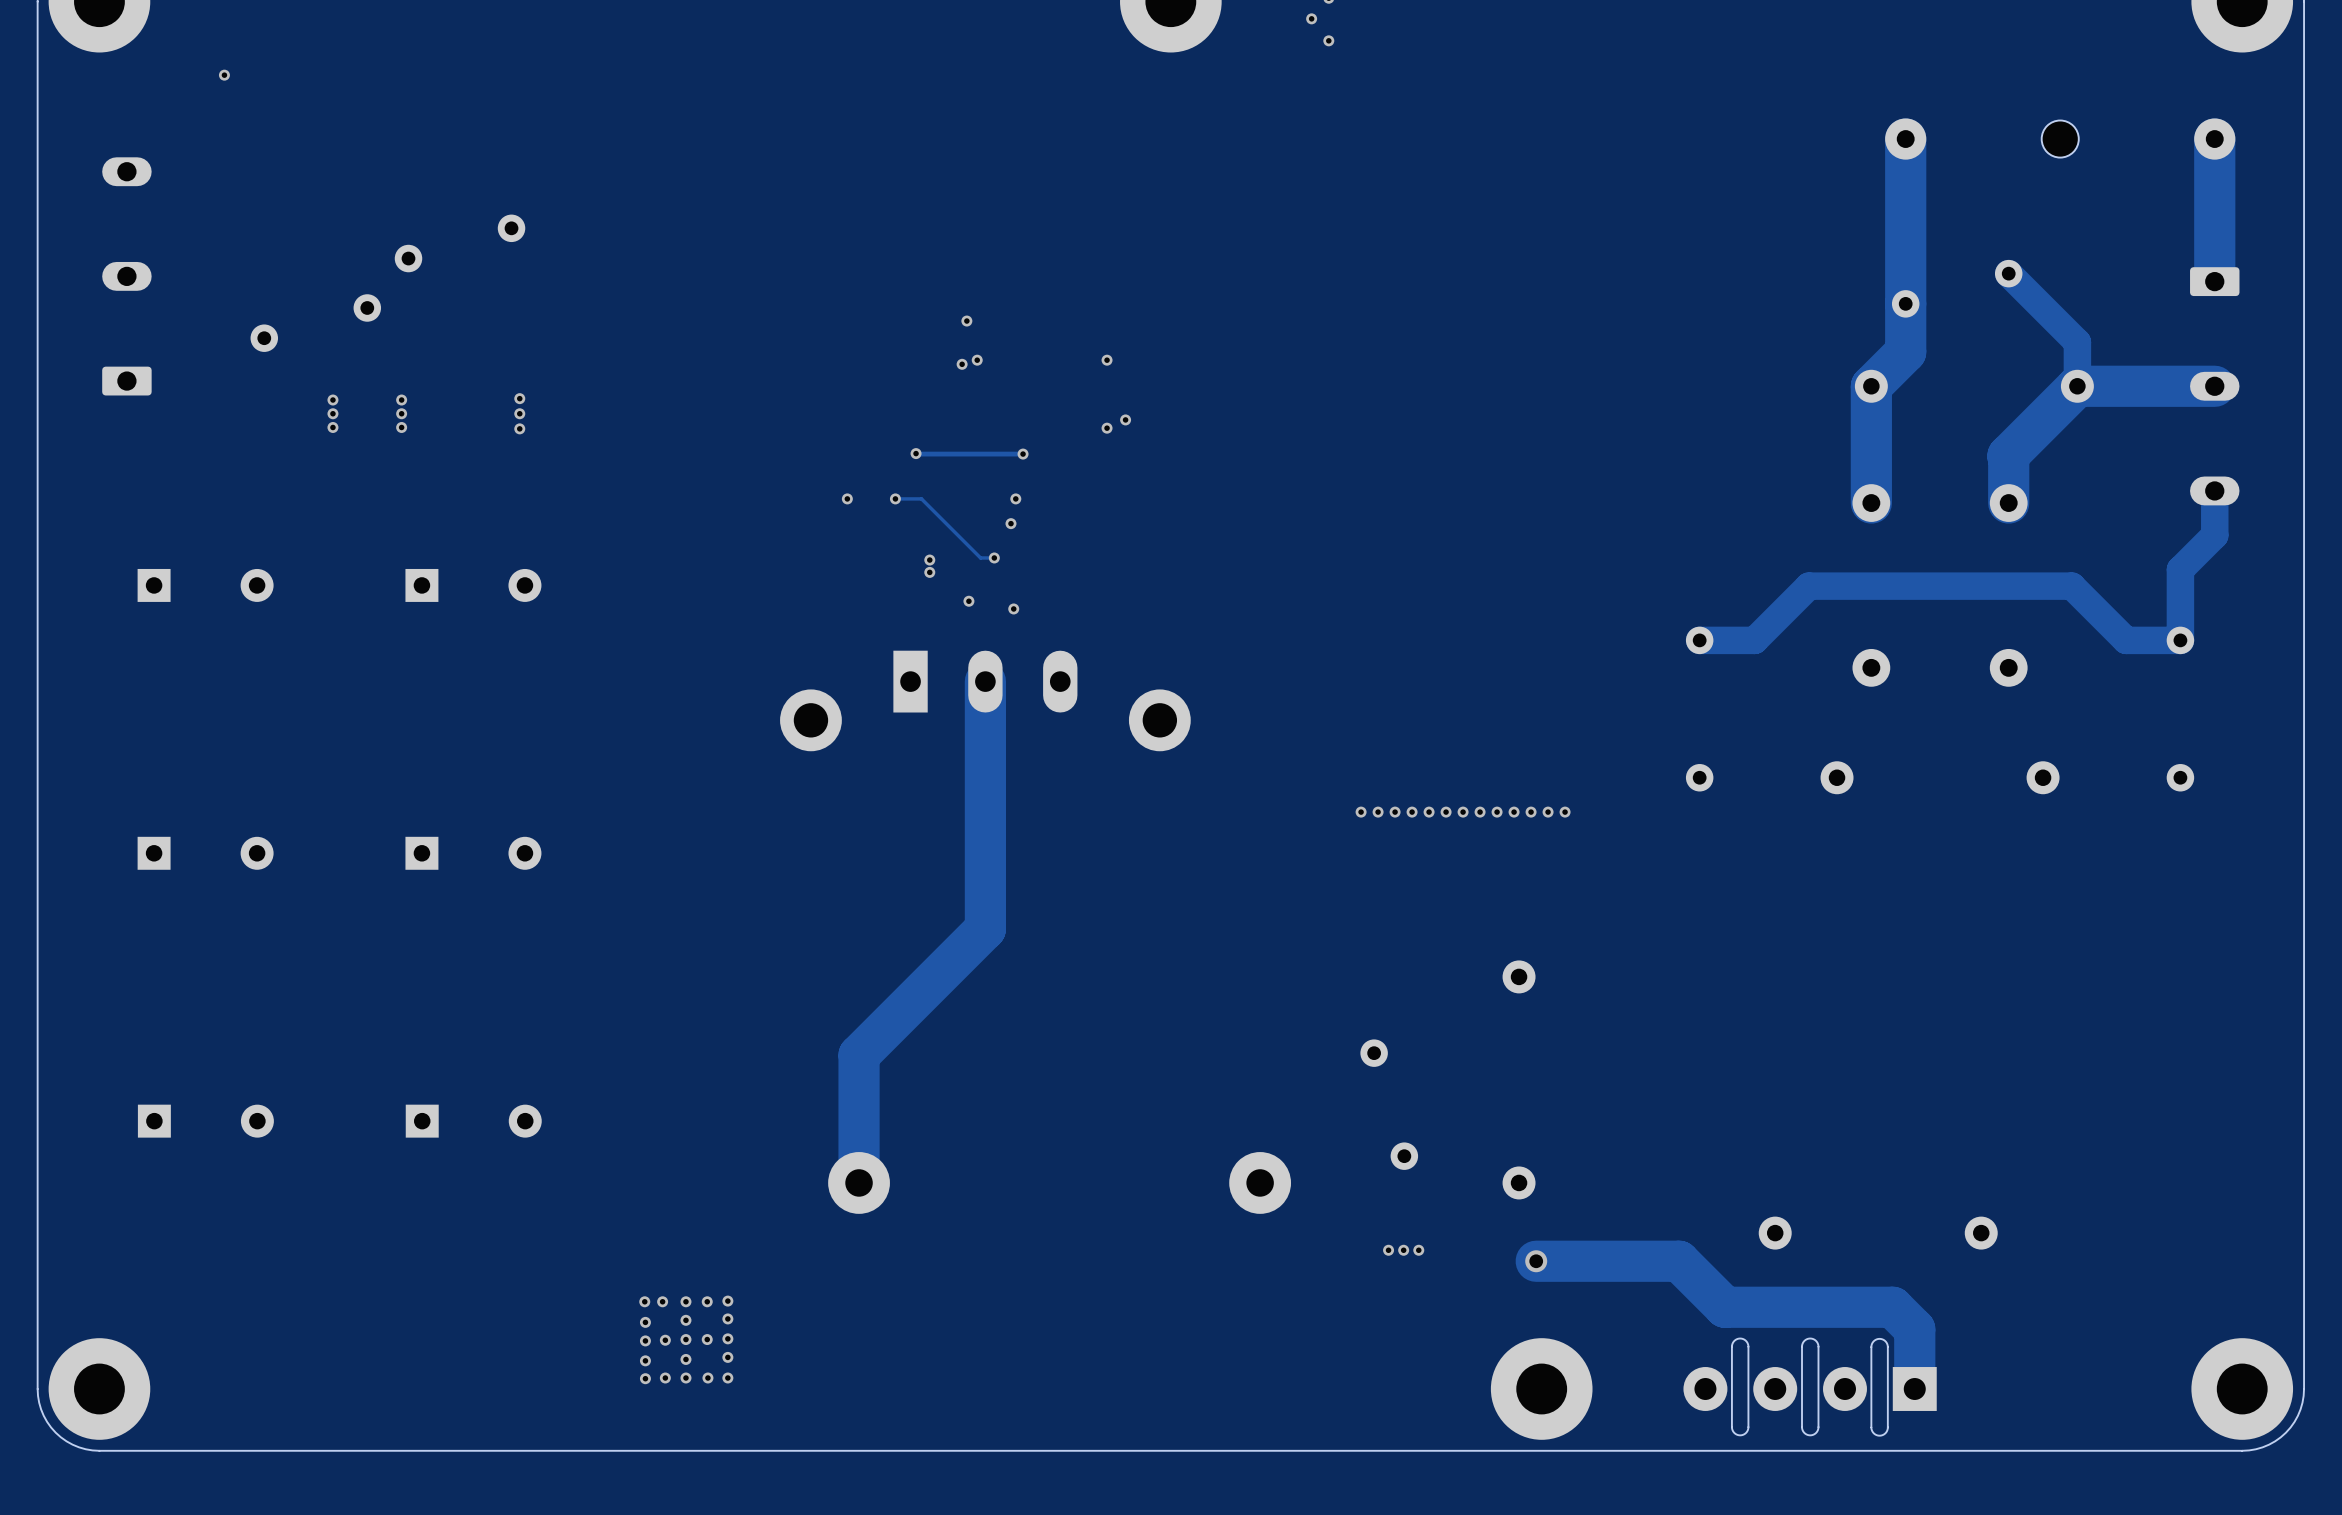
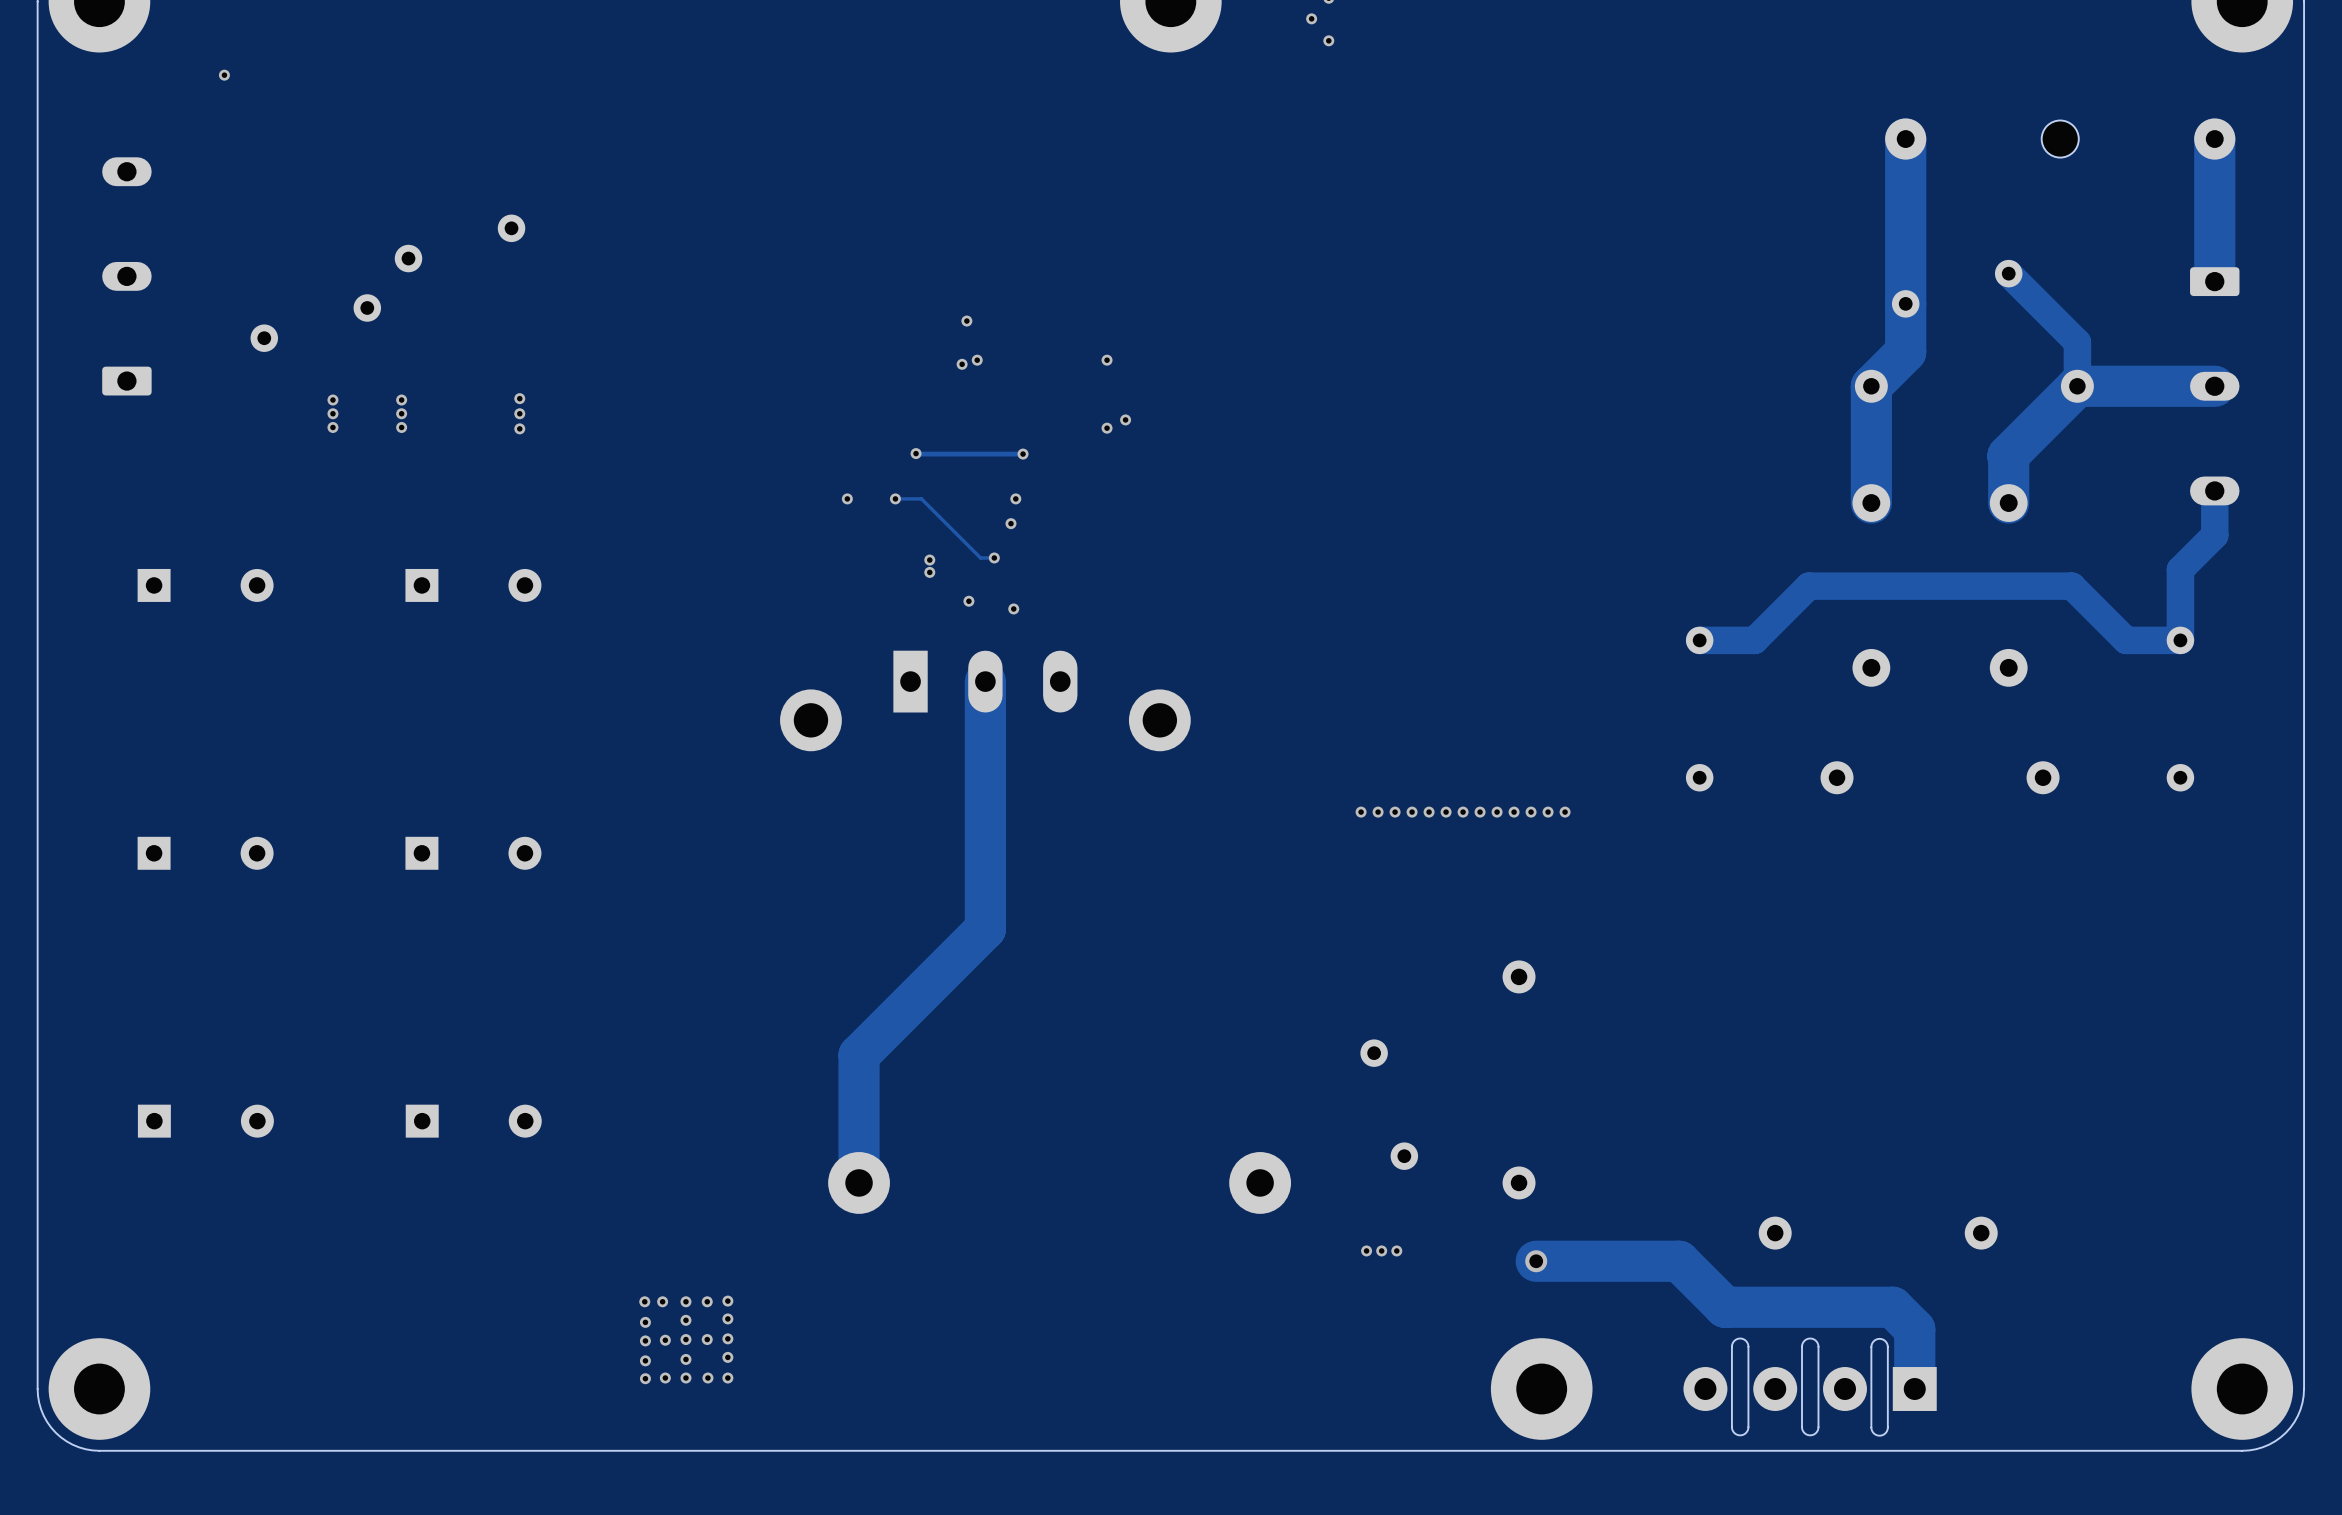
via: none -> (1366, 1250)
via: none -> (1381, 1250)
via: (1388, 1250) -> none
via: none -> (1396, 1250)
via: (1403, 1250) -> none
via: (1418, 1250) -> none

